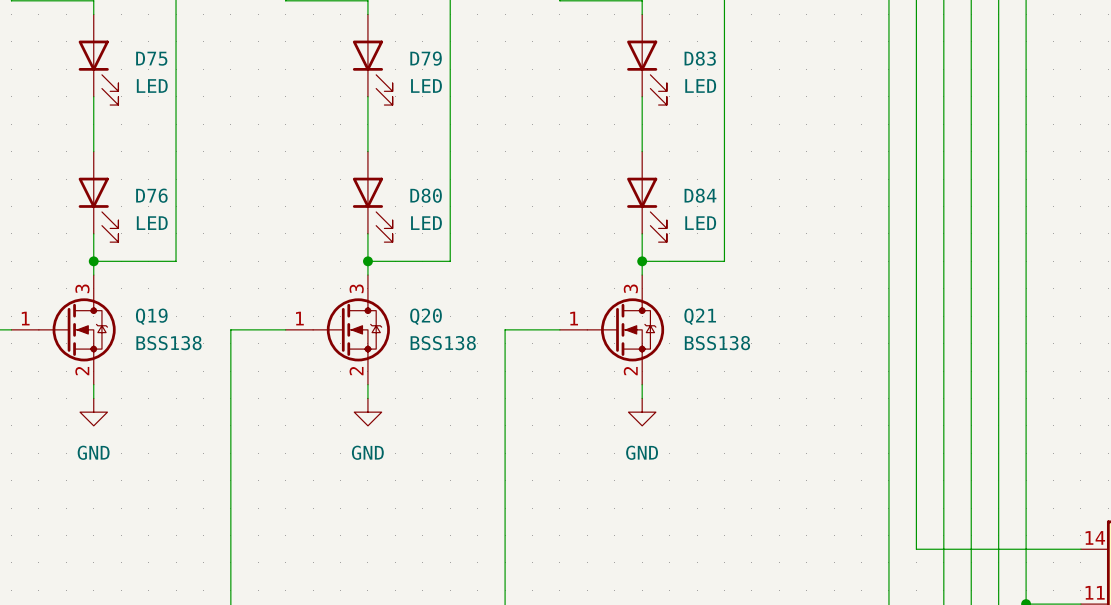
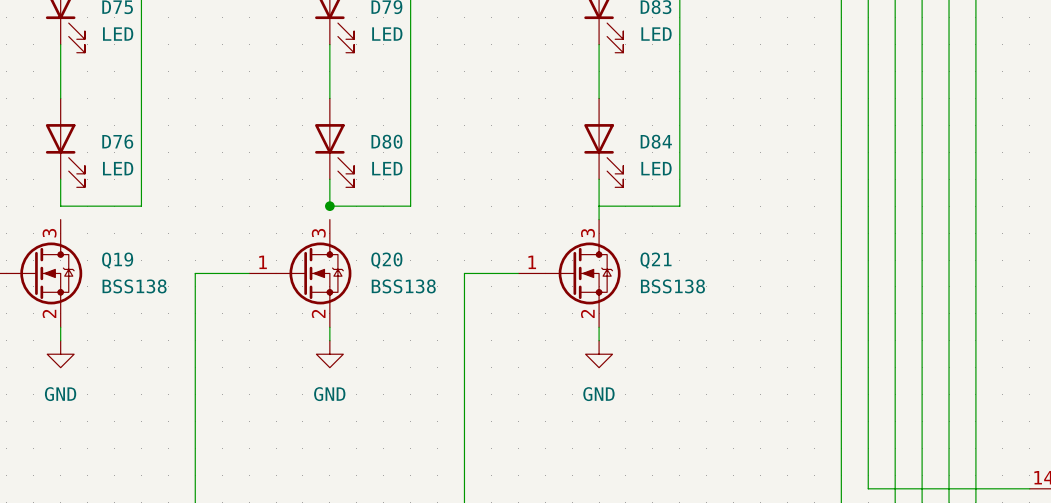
wire: (93, 261) (93, 275) -> none
junction: (93, 261) -> none
wire: (367, 261) (367, 275) -> none
junction: (642, 261) -> none

